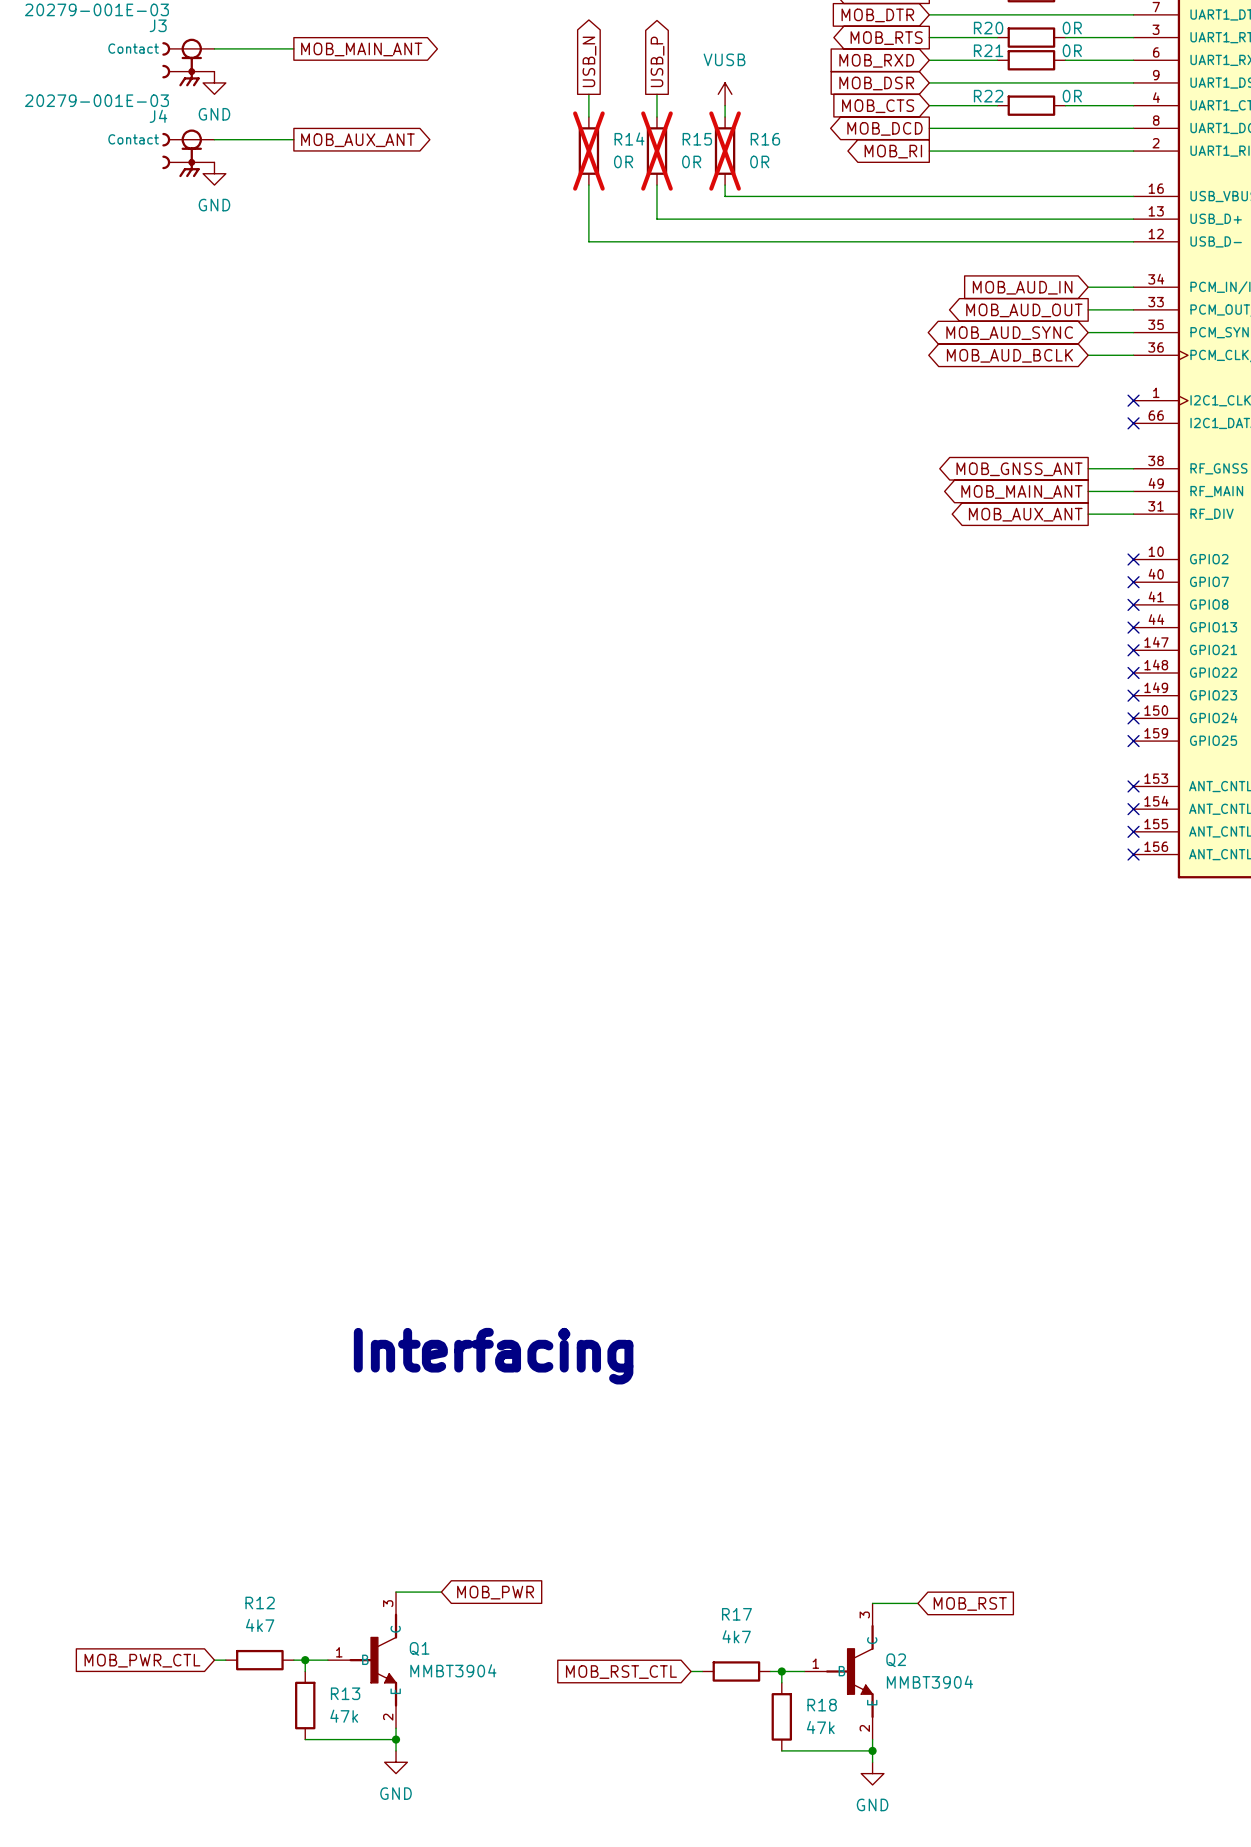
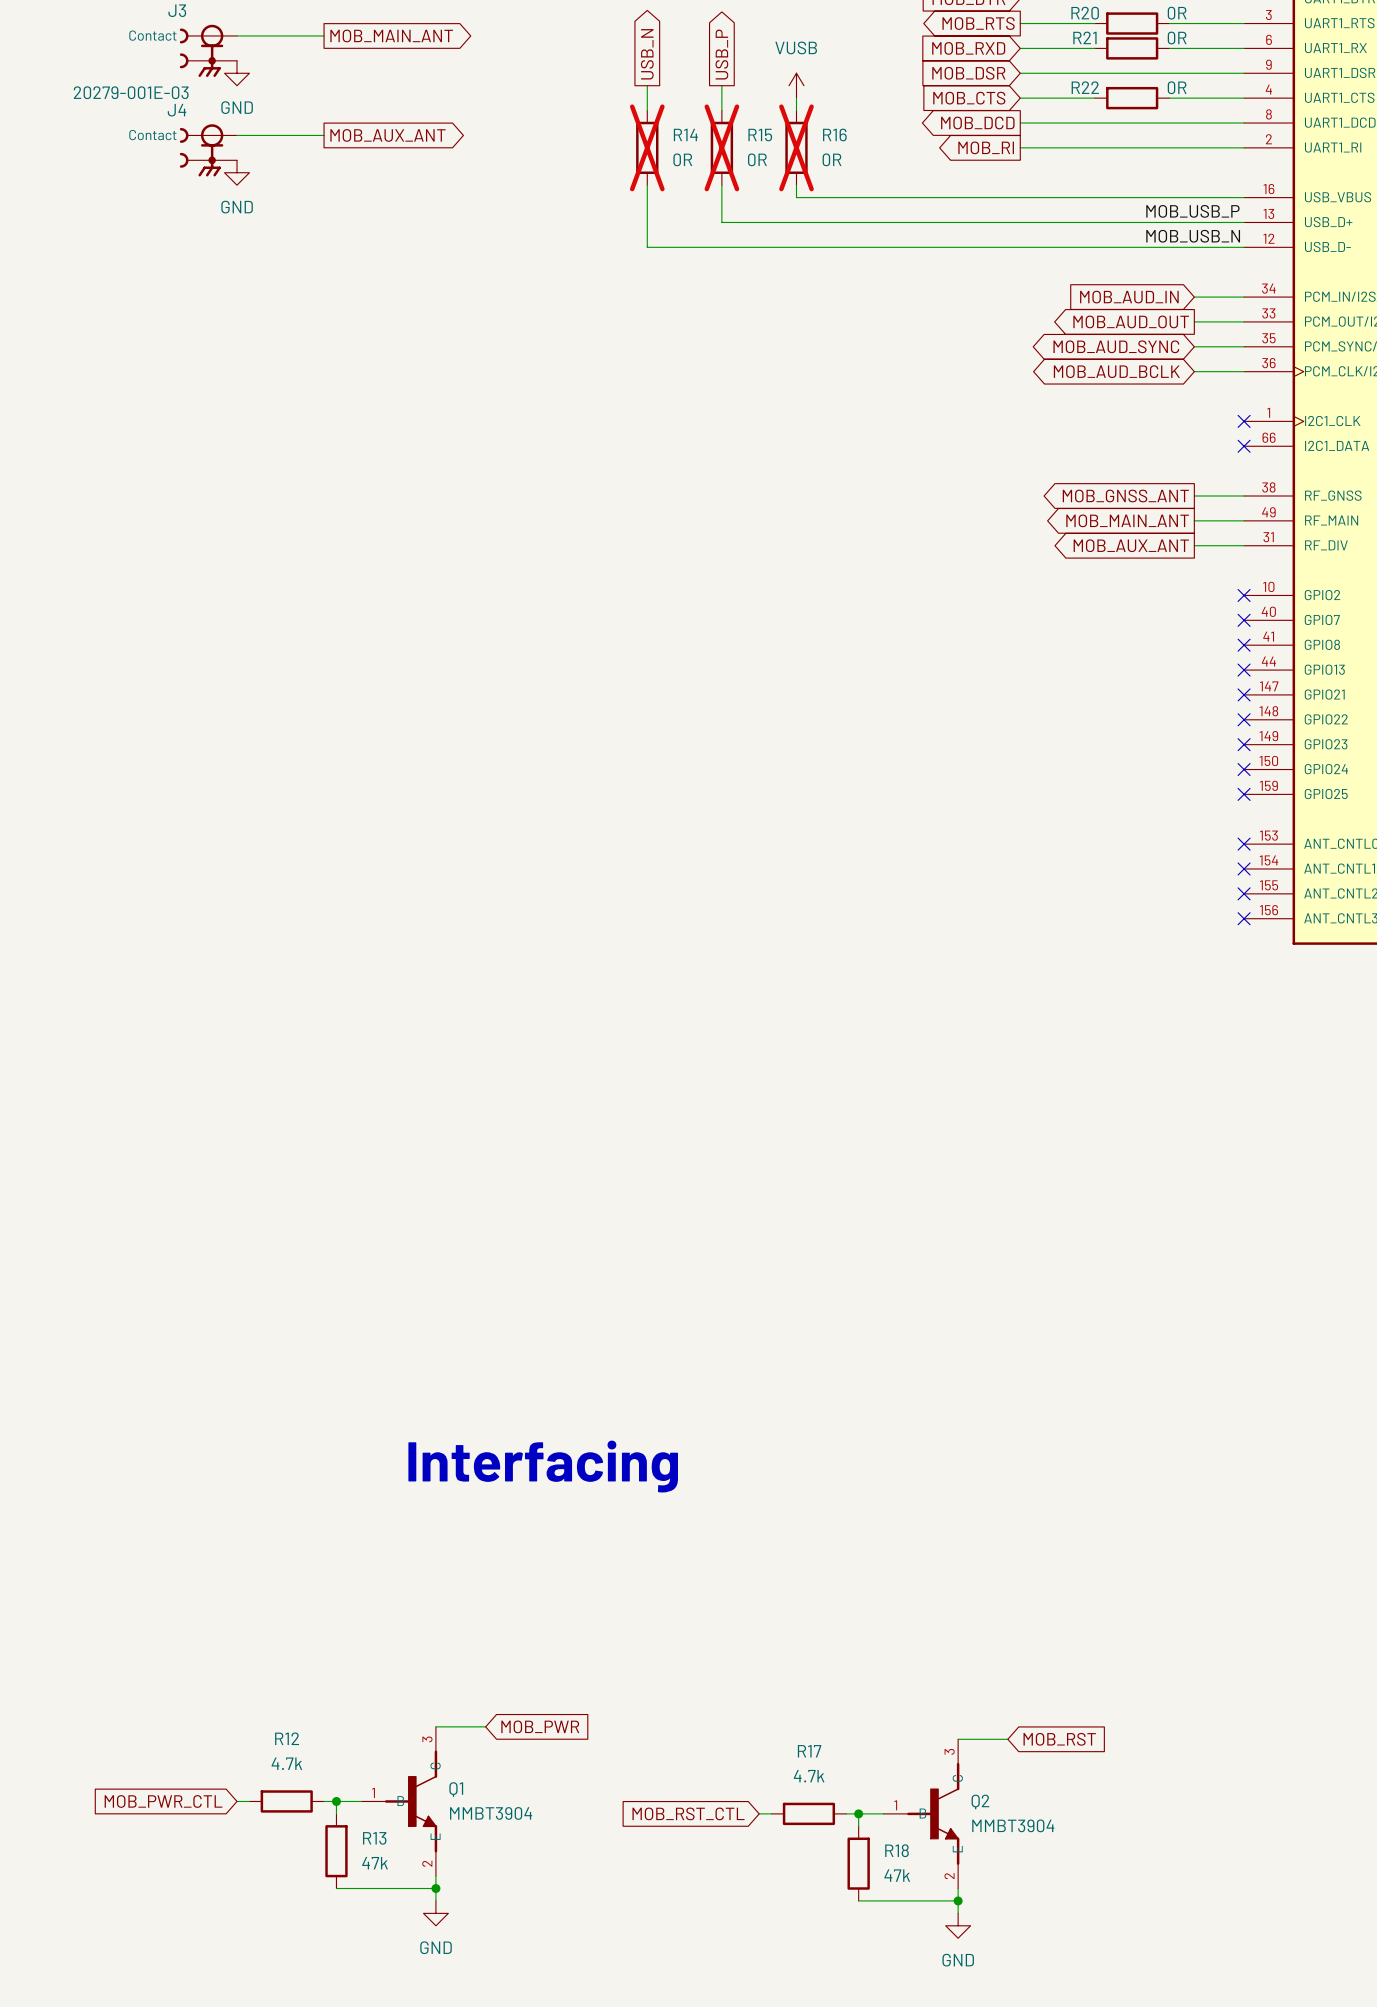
label: none -> MOB_USB_P (1192, 211)
label: none -> MOB_USB_N (1193, 236)
R12 value: 4k7 (260, 1625) -> 4.7k (286, 1763)
R17 value: 4k7 (736, 1636) -> 4.7k (809, 1776)

